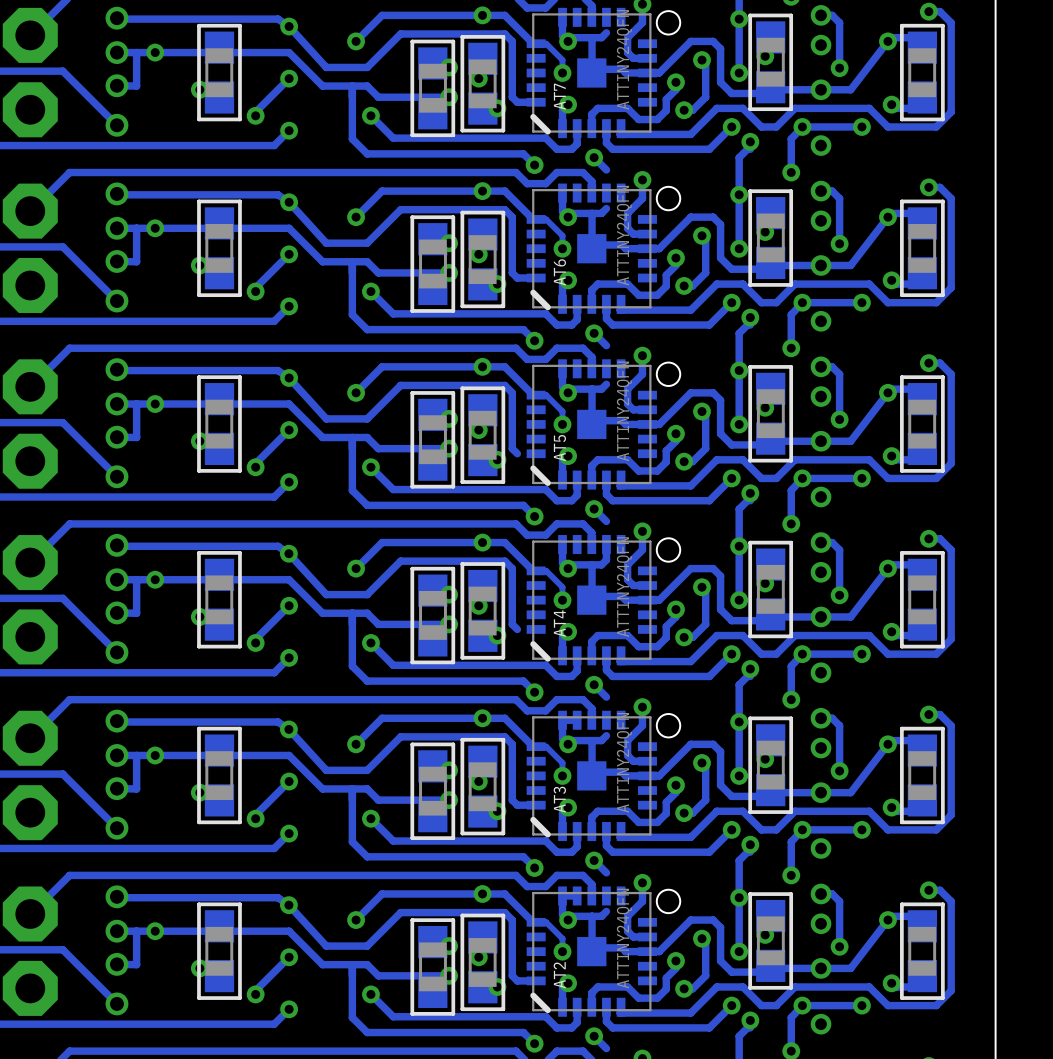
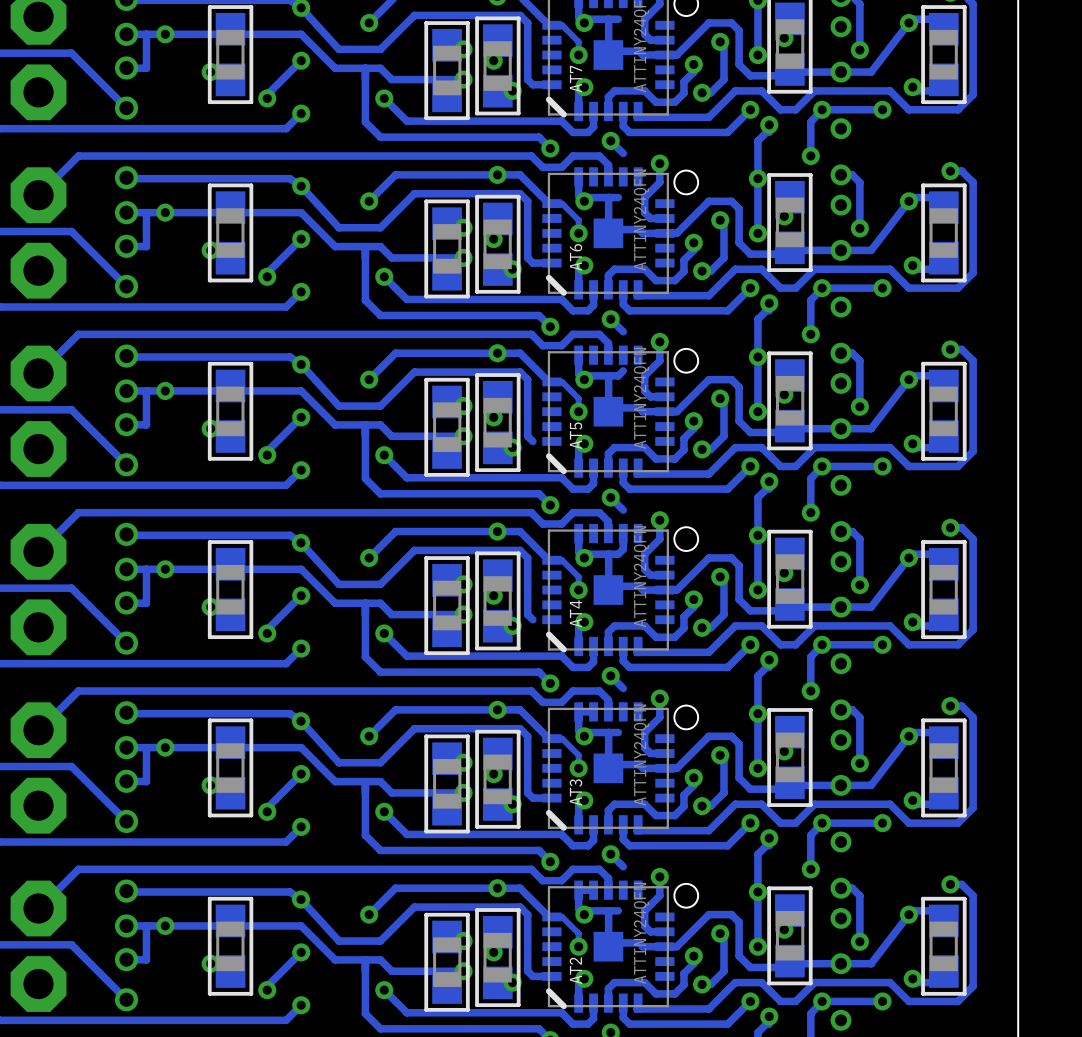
track: (606, 32) (601, 37) -> none
track: (606, 208) (601, 213) -> none
track: (606, 735) (601, 740) -> none
track: (606, 911) (601, 916) -> none

